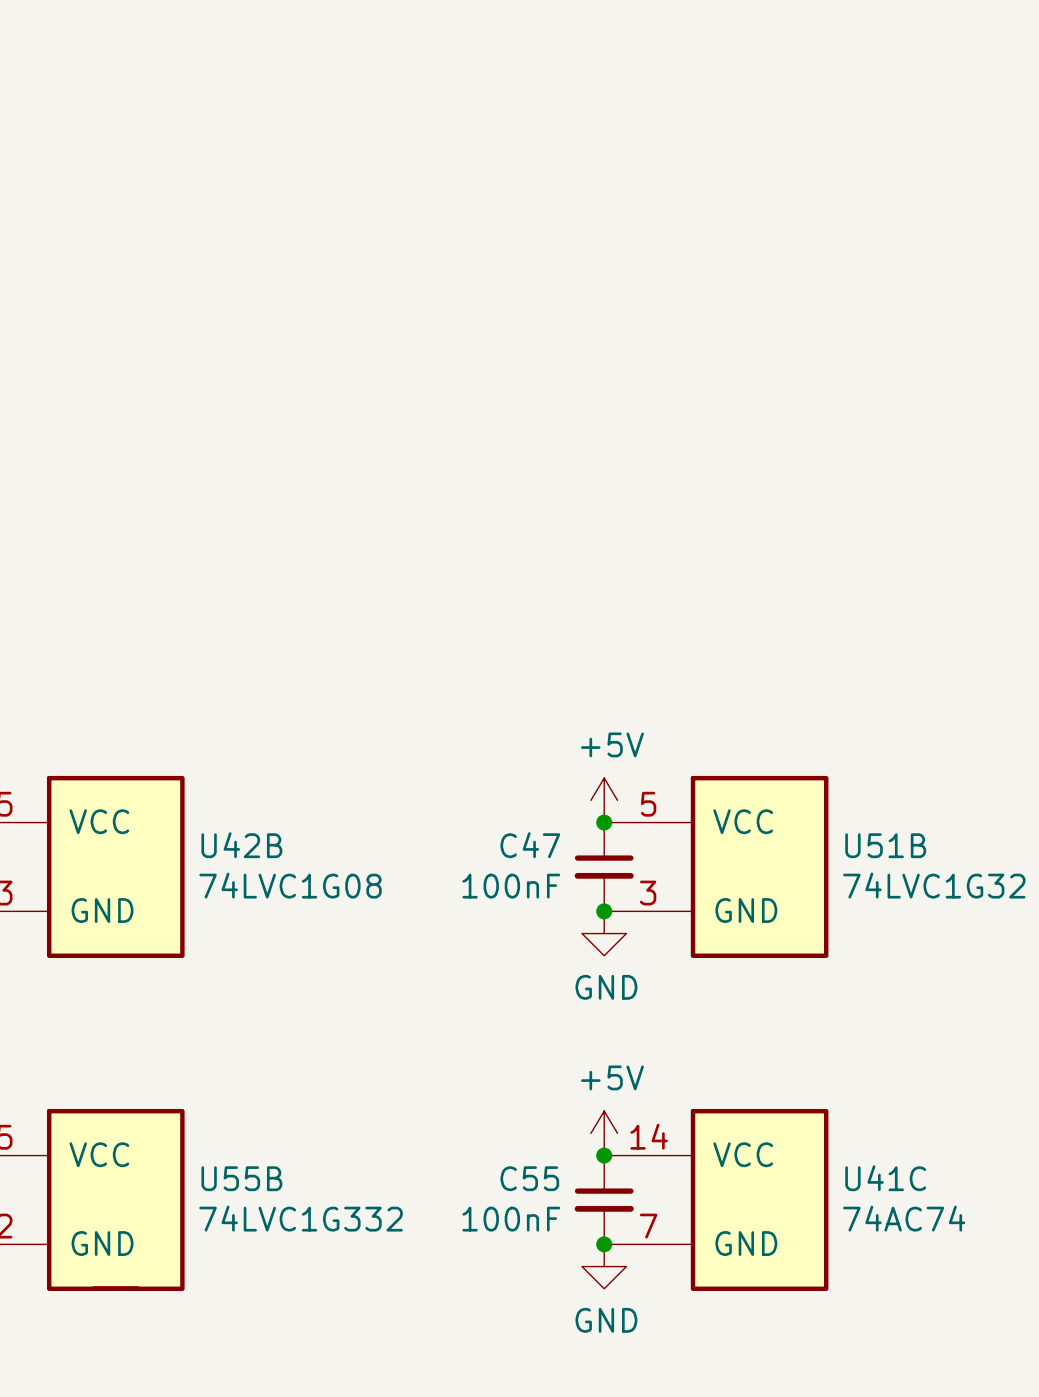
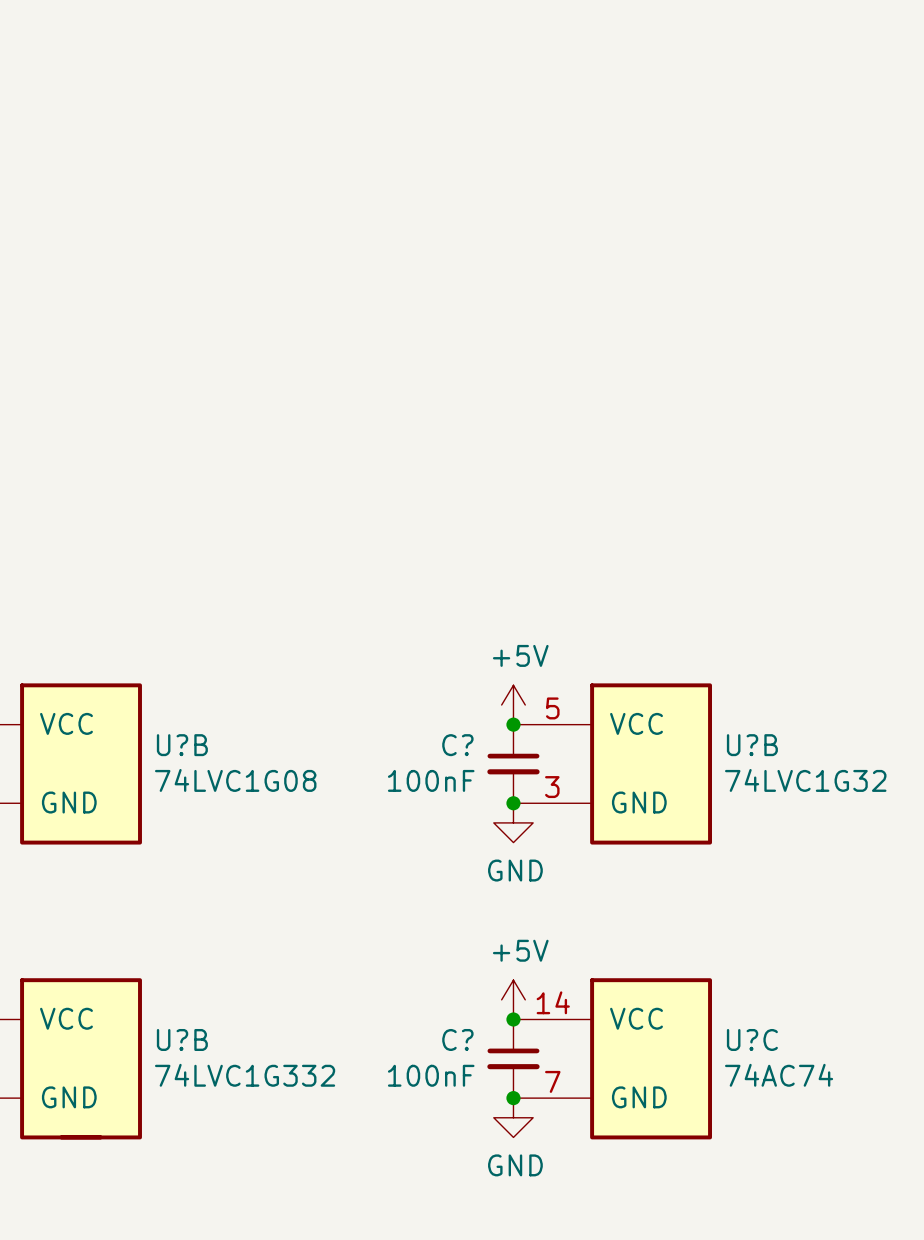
U42B name: U42B (241, 845) -> U?B (182, 745)
C47 name: C47 (530, 845) -> C? (457, 745)
U51B name: U51B (885, 845) -> U?B (752, 745)
U55B name: U55B (241, 1178) -> U?B (182, 1039)
C55 name: C55 (529, 1178) -> C? (457, 1039)
U41C name: U41C (885, 1178) -> U?C (752, 1039)

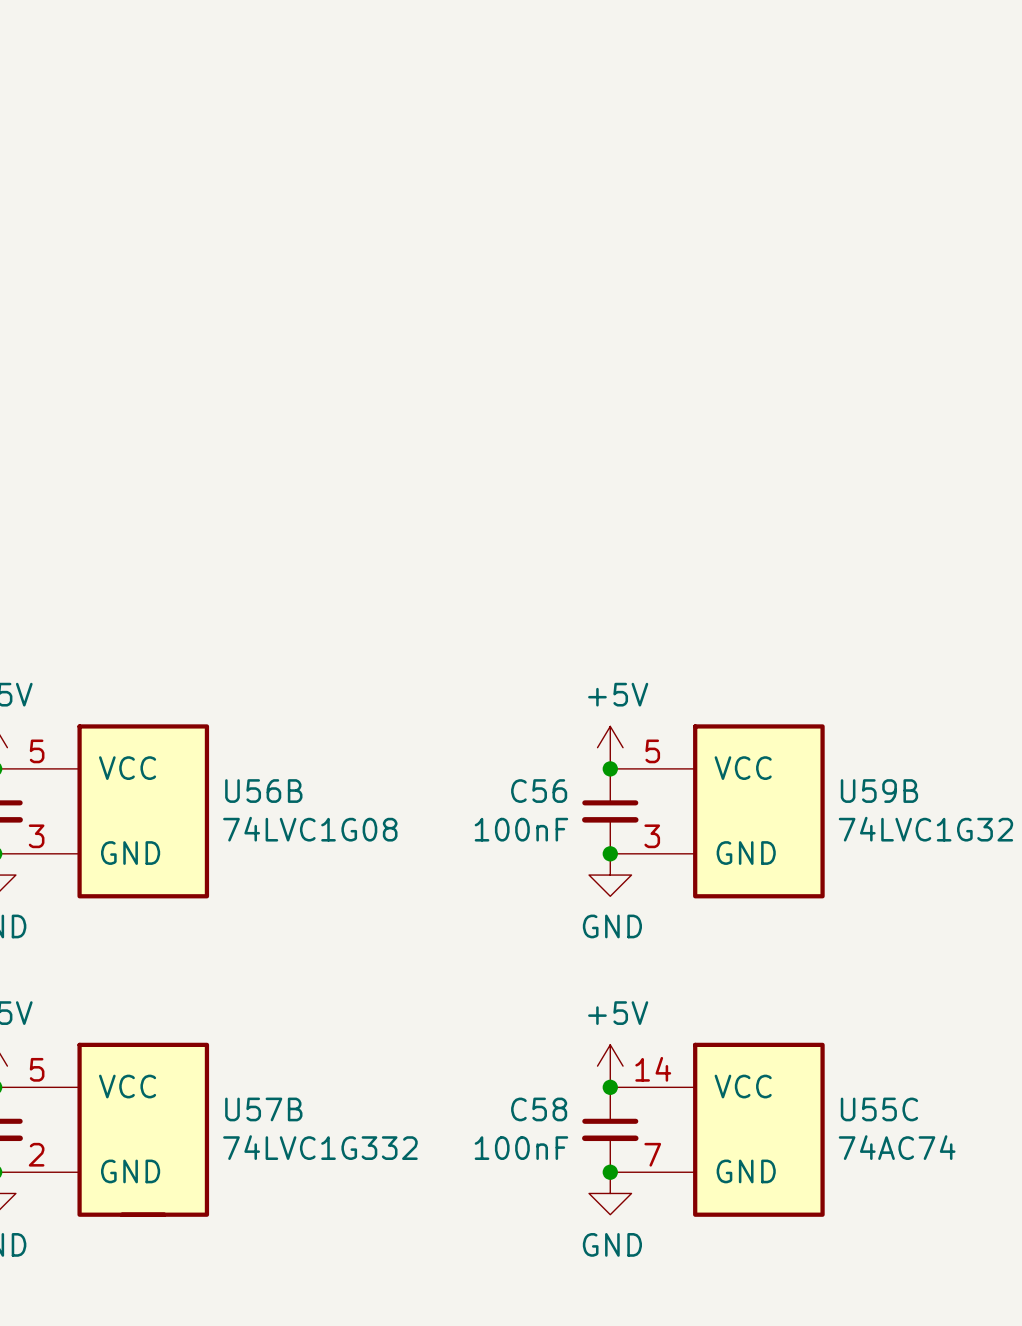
U?B name: U?B (182, 745) -> U56B (263, 791)
C? name: C? (457, 745) -> C56 (539, 791)
U?B name: U?B (752, 745) -> U59B (879, 791)
U?B name: U?B (182, 1039) -> U57B (263, 1109)
C? name: C? (457, 1039) -> C58 (539, 1109)
U?C name: U?C (752, 1039) -> U55C (879, 1109)

